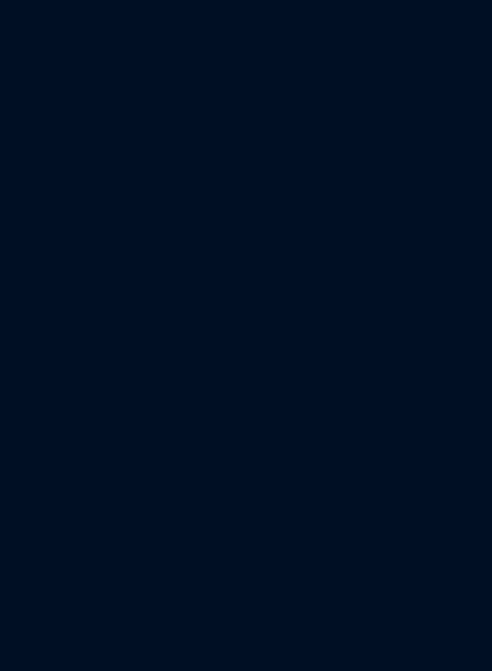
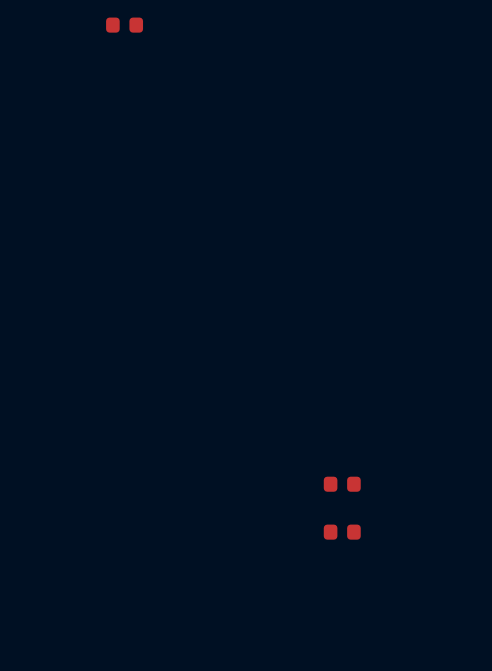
part: none -> (124, 25)
part: none -> (342, 484)
part: none -> (342, 532)

